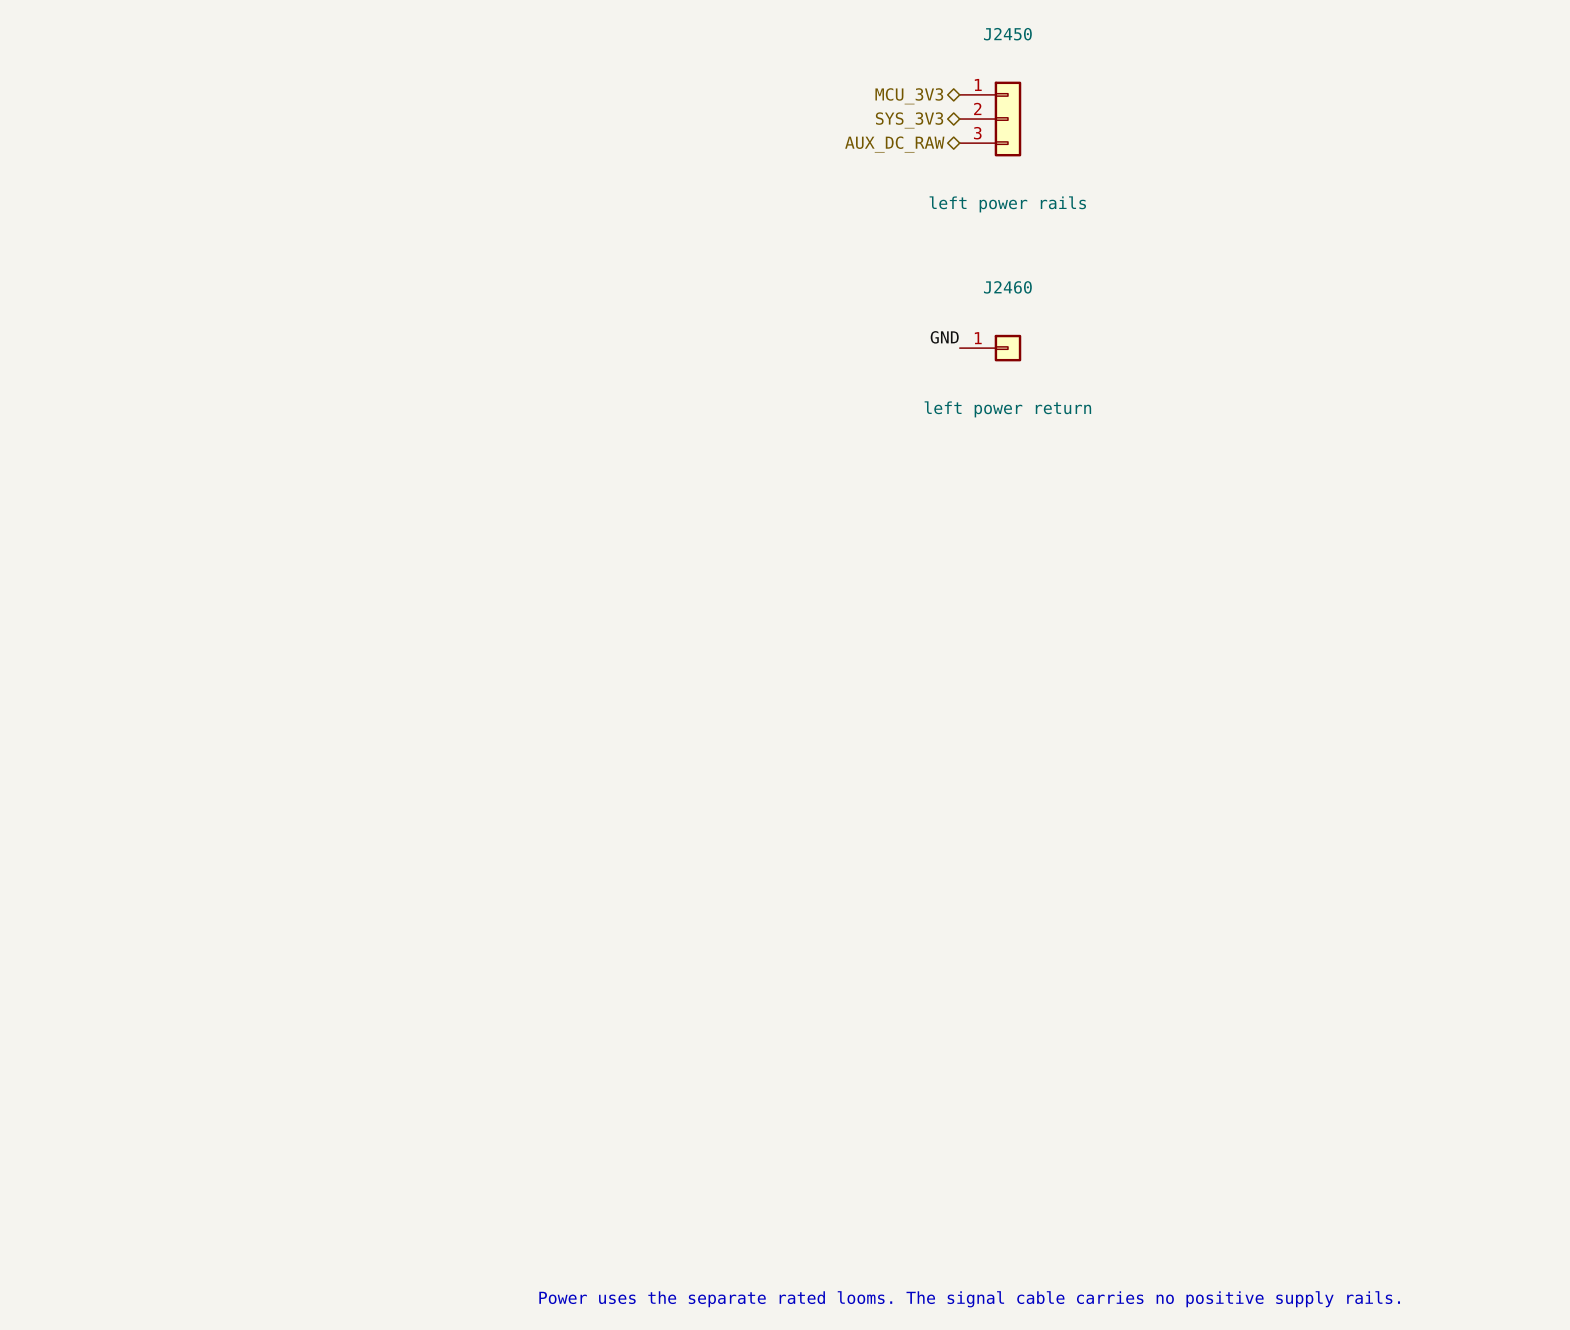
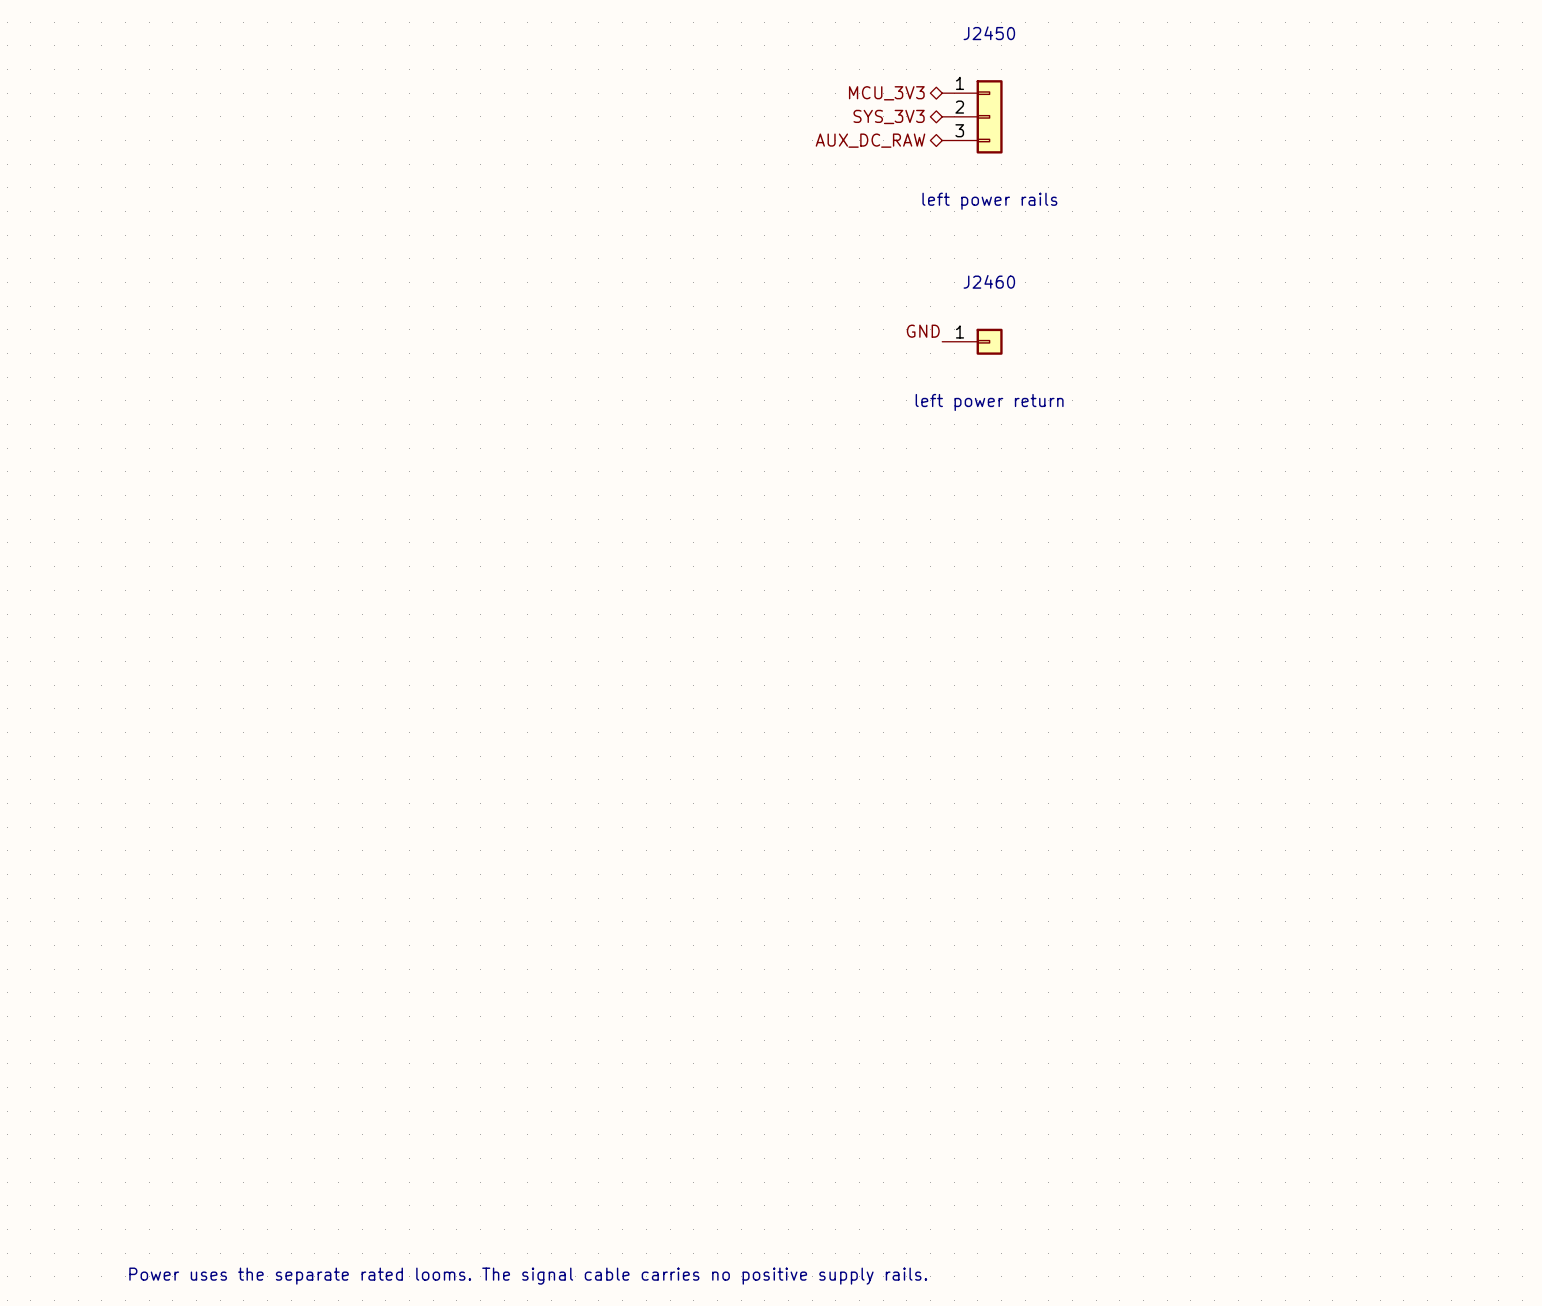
text position: Power uses the separate rated looms. The signal cable carries no positive supply rails. (969, 1299) -> Power uses the separate rated looms. The signal cable carries no positive supply rails. (528, 1276)

